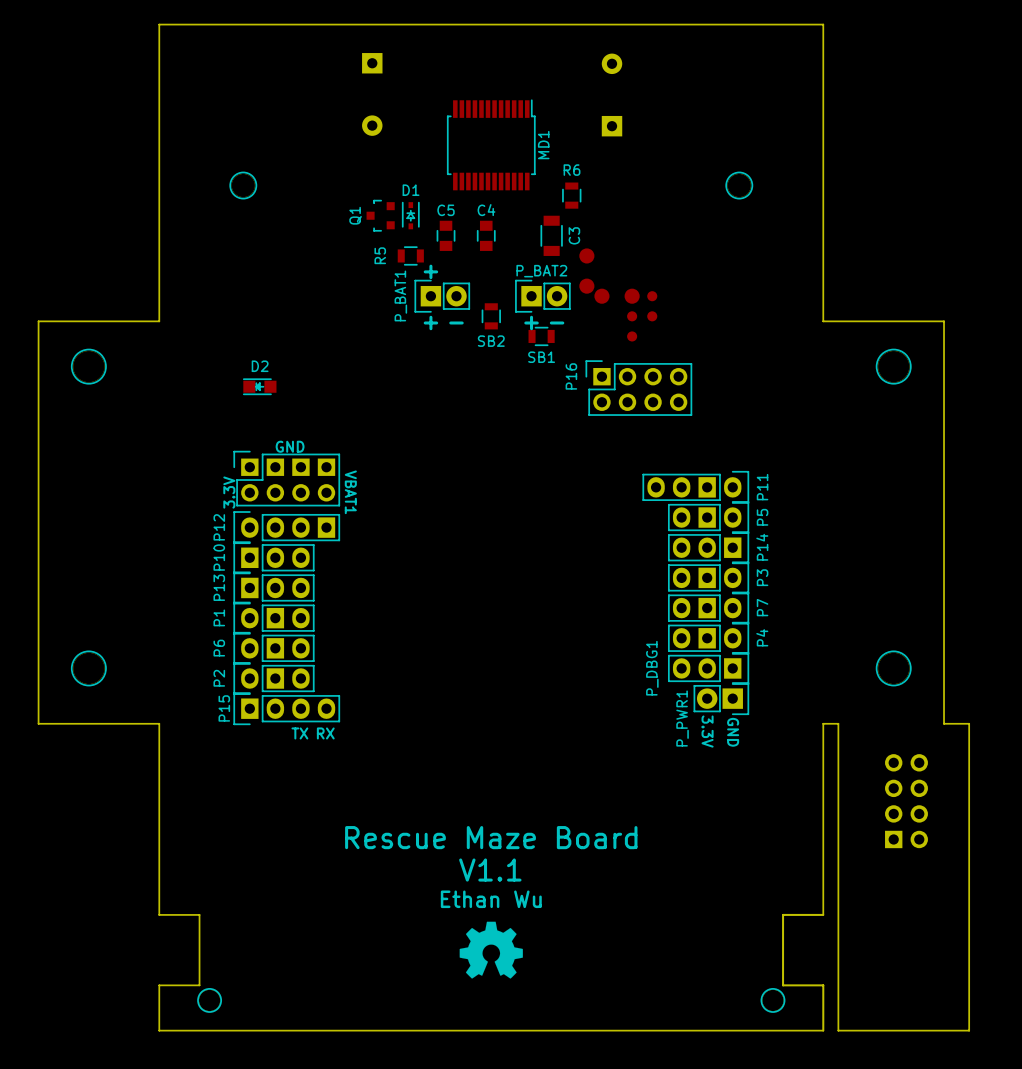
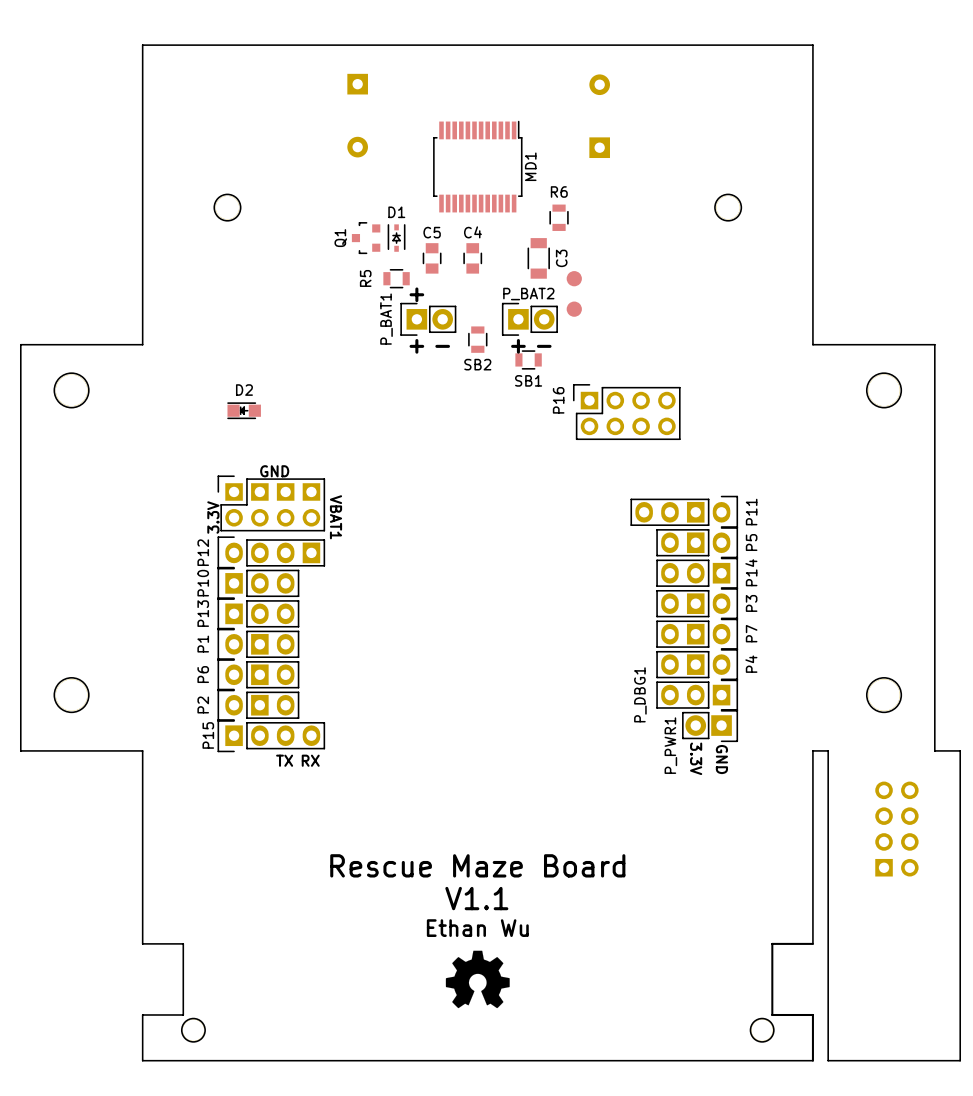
part: (617, 296) -> none
part: (652, 306) -> none
part: (632, 326) -> none

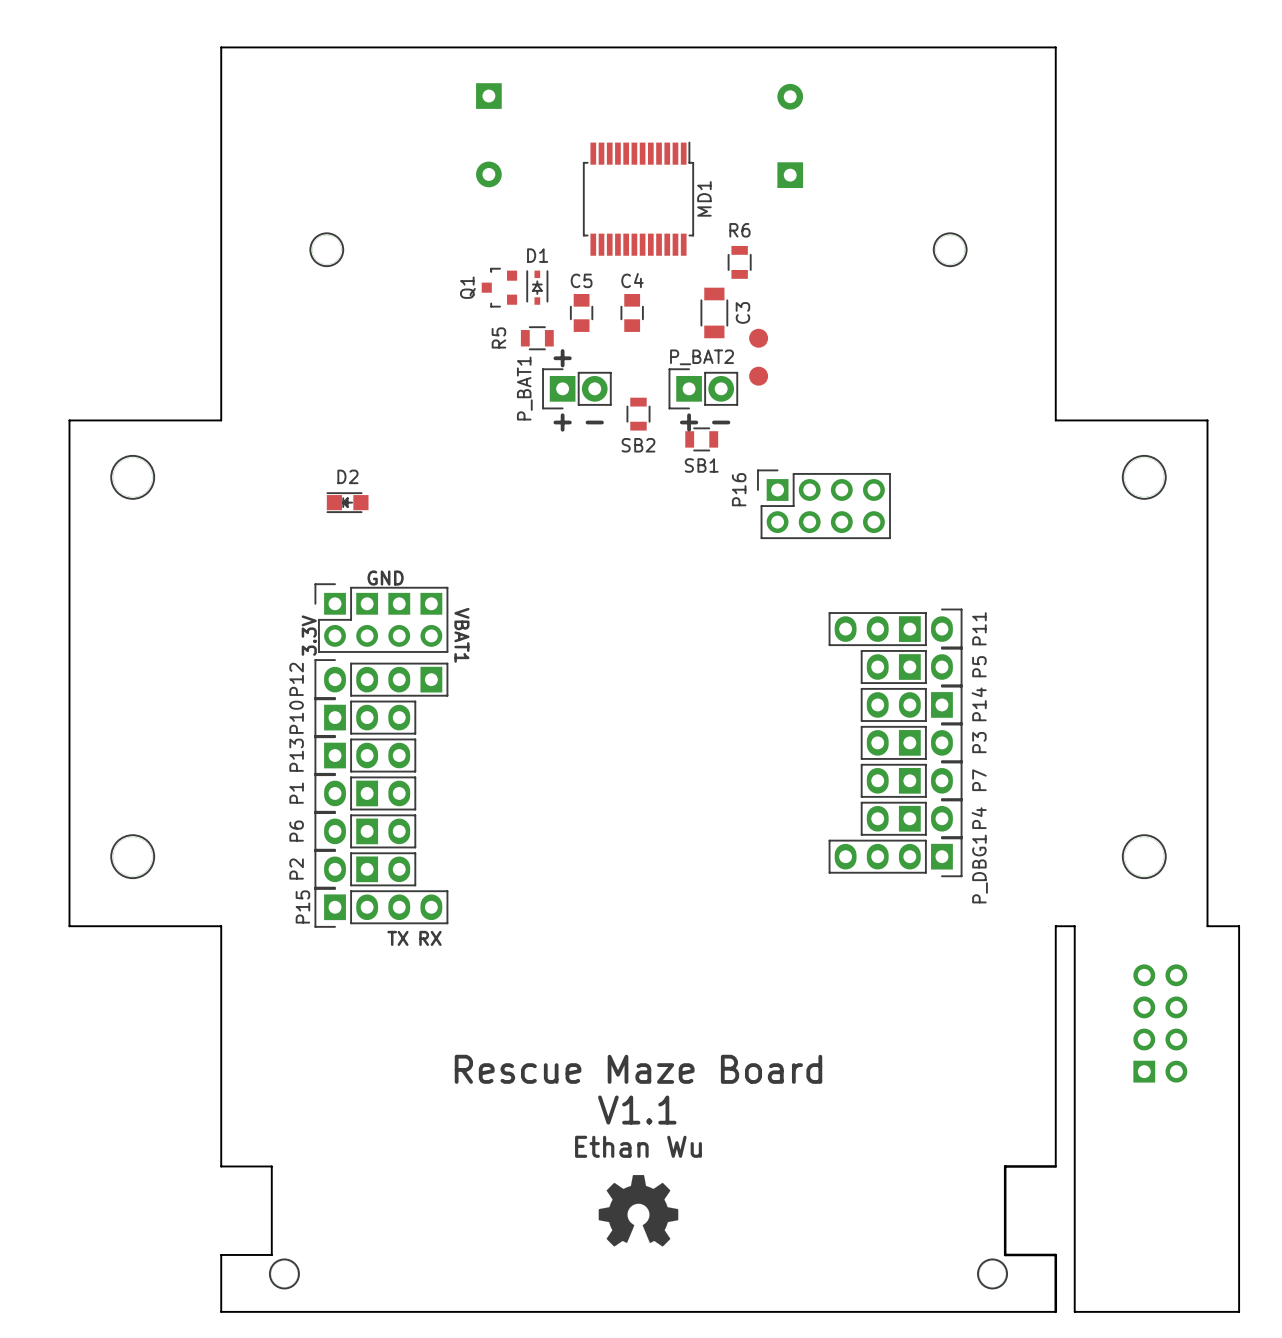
P_DBG1 footprint: [656, 678, 739, 712] -> [828, 836, 963, 878]
P_DBG1 name position: P_DBG1 (640, 694) -> P_DBG1 (980, 869)
P_PWR1: (710, 725) -> none
text: 3.3V (696, 758) -> none
text: GND (721, 759) -> none

